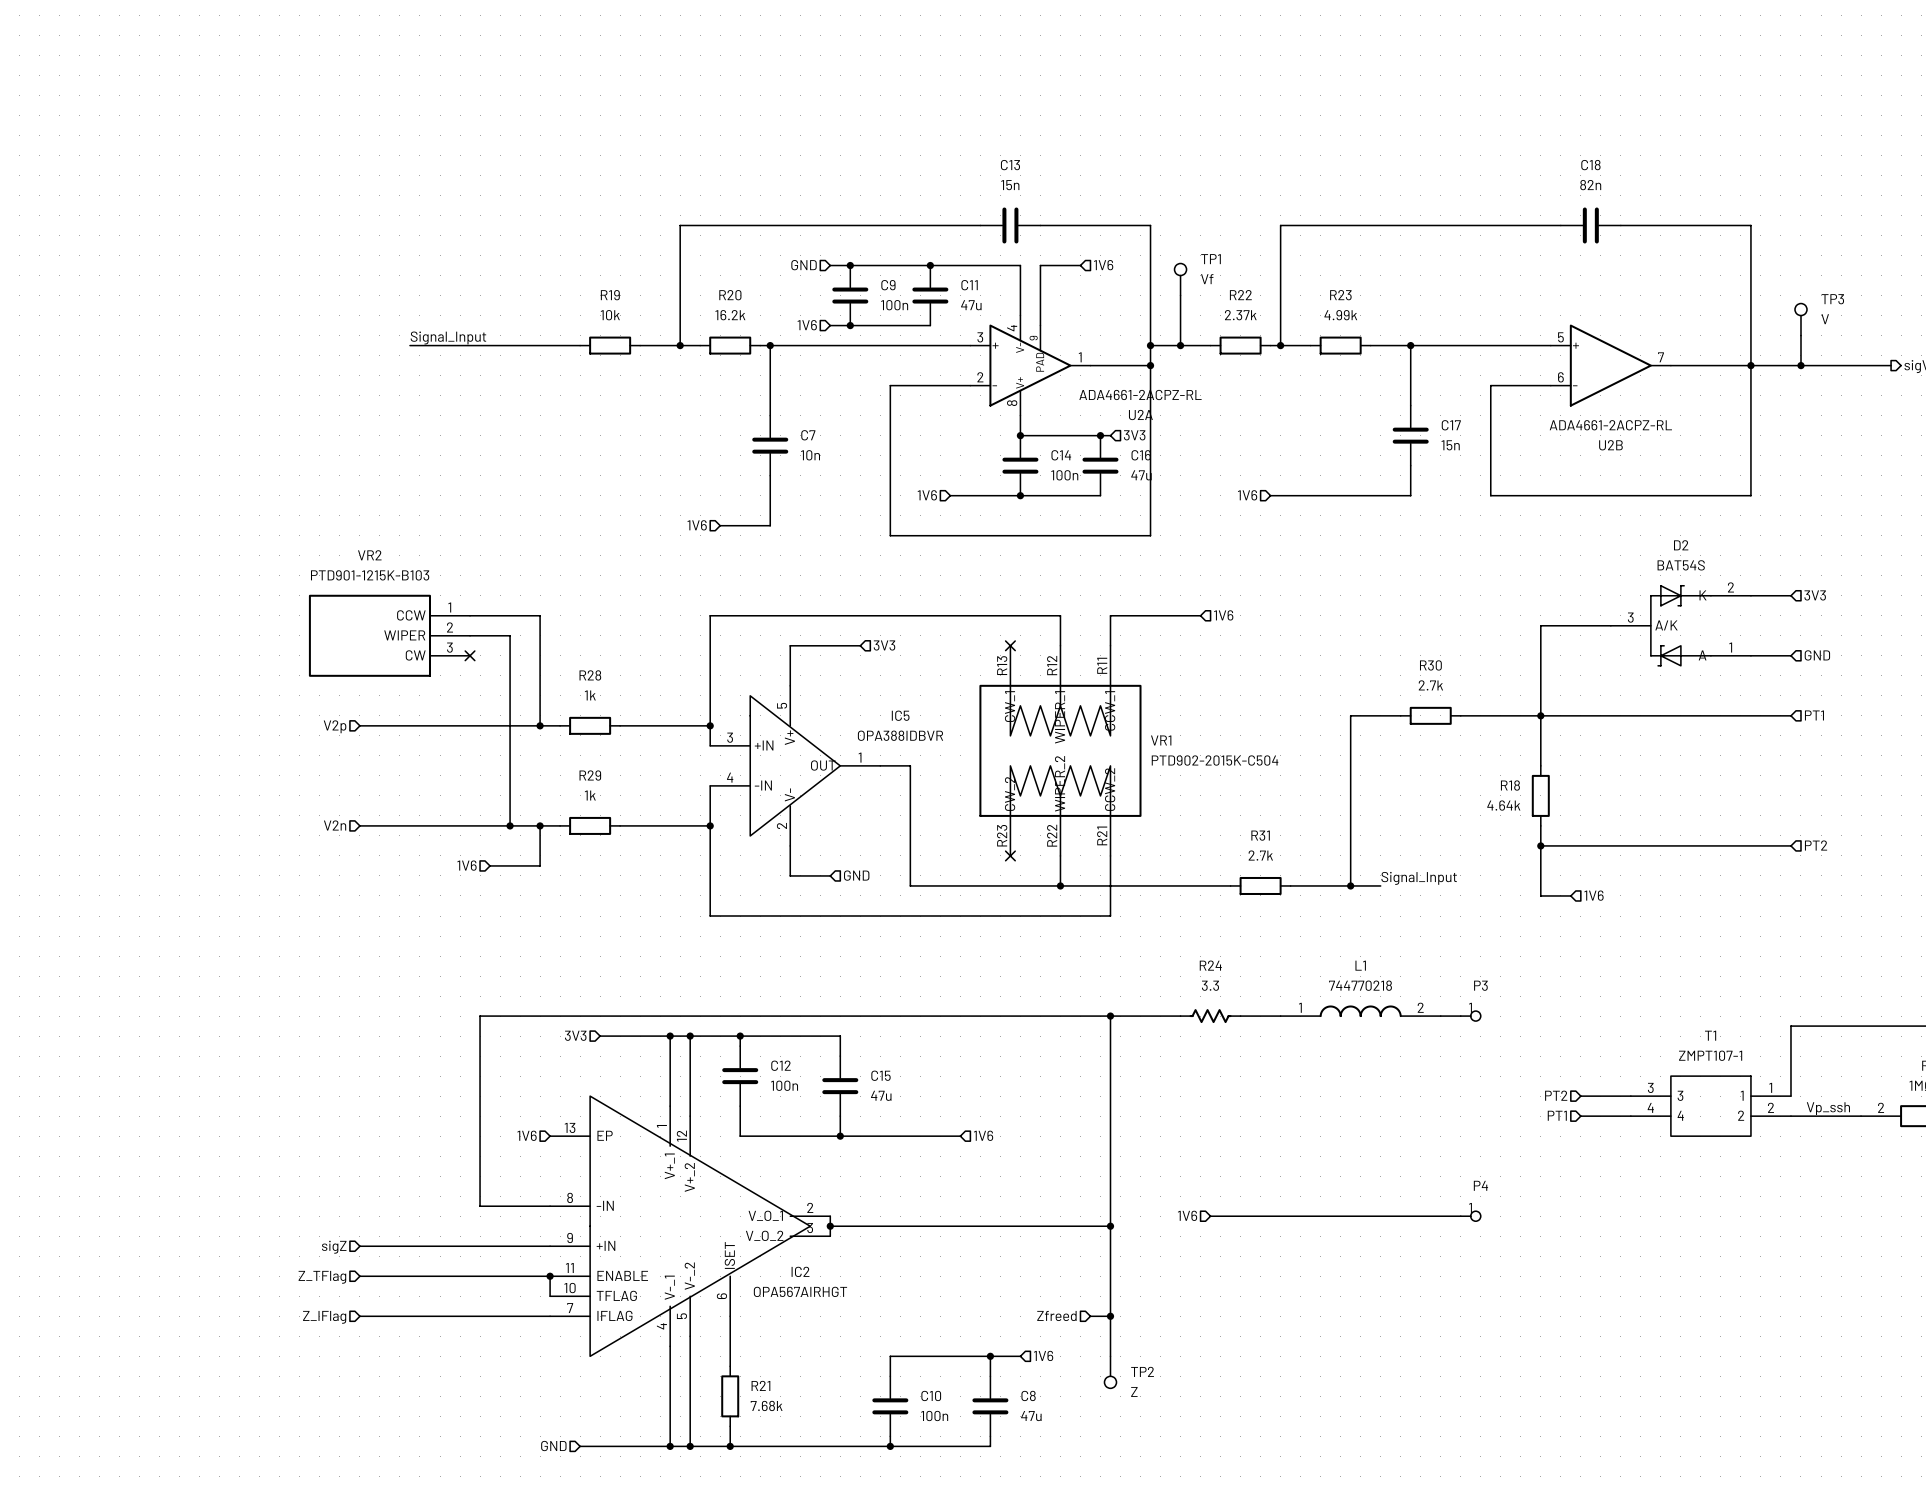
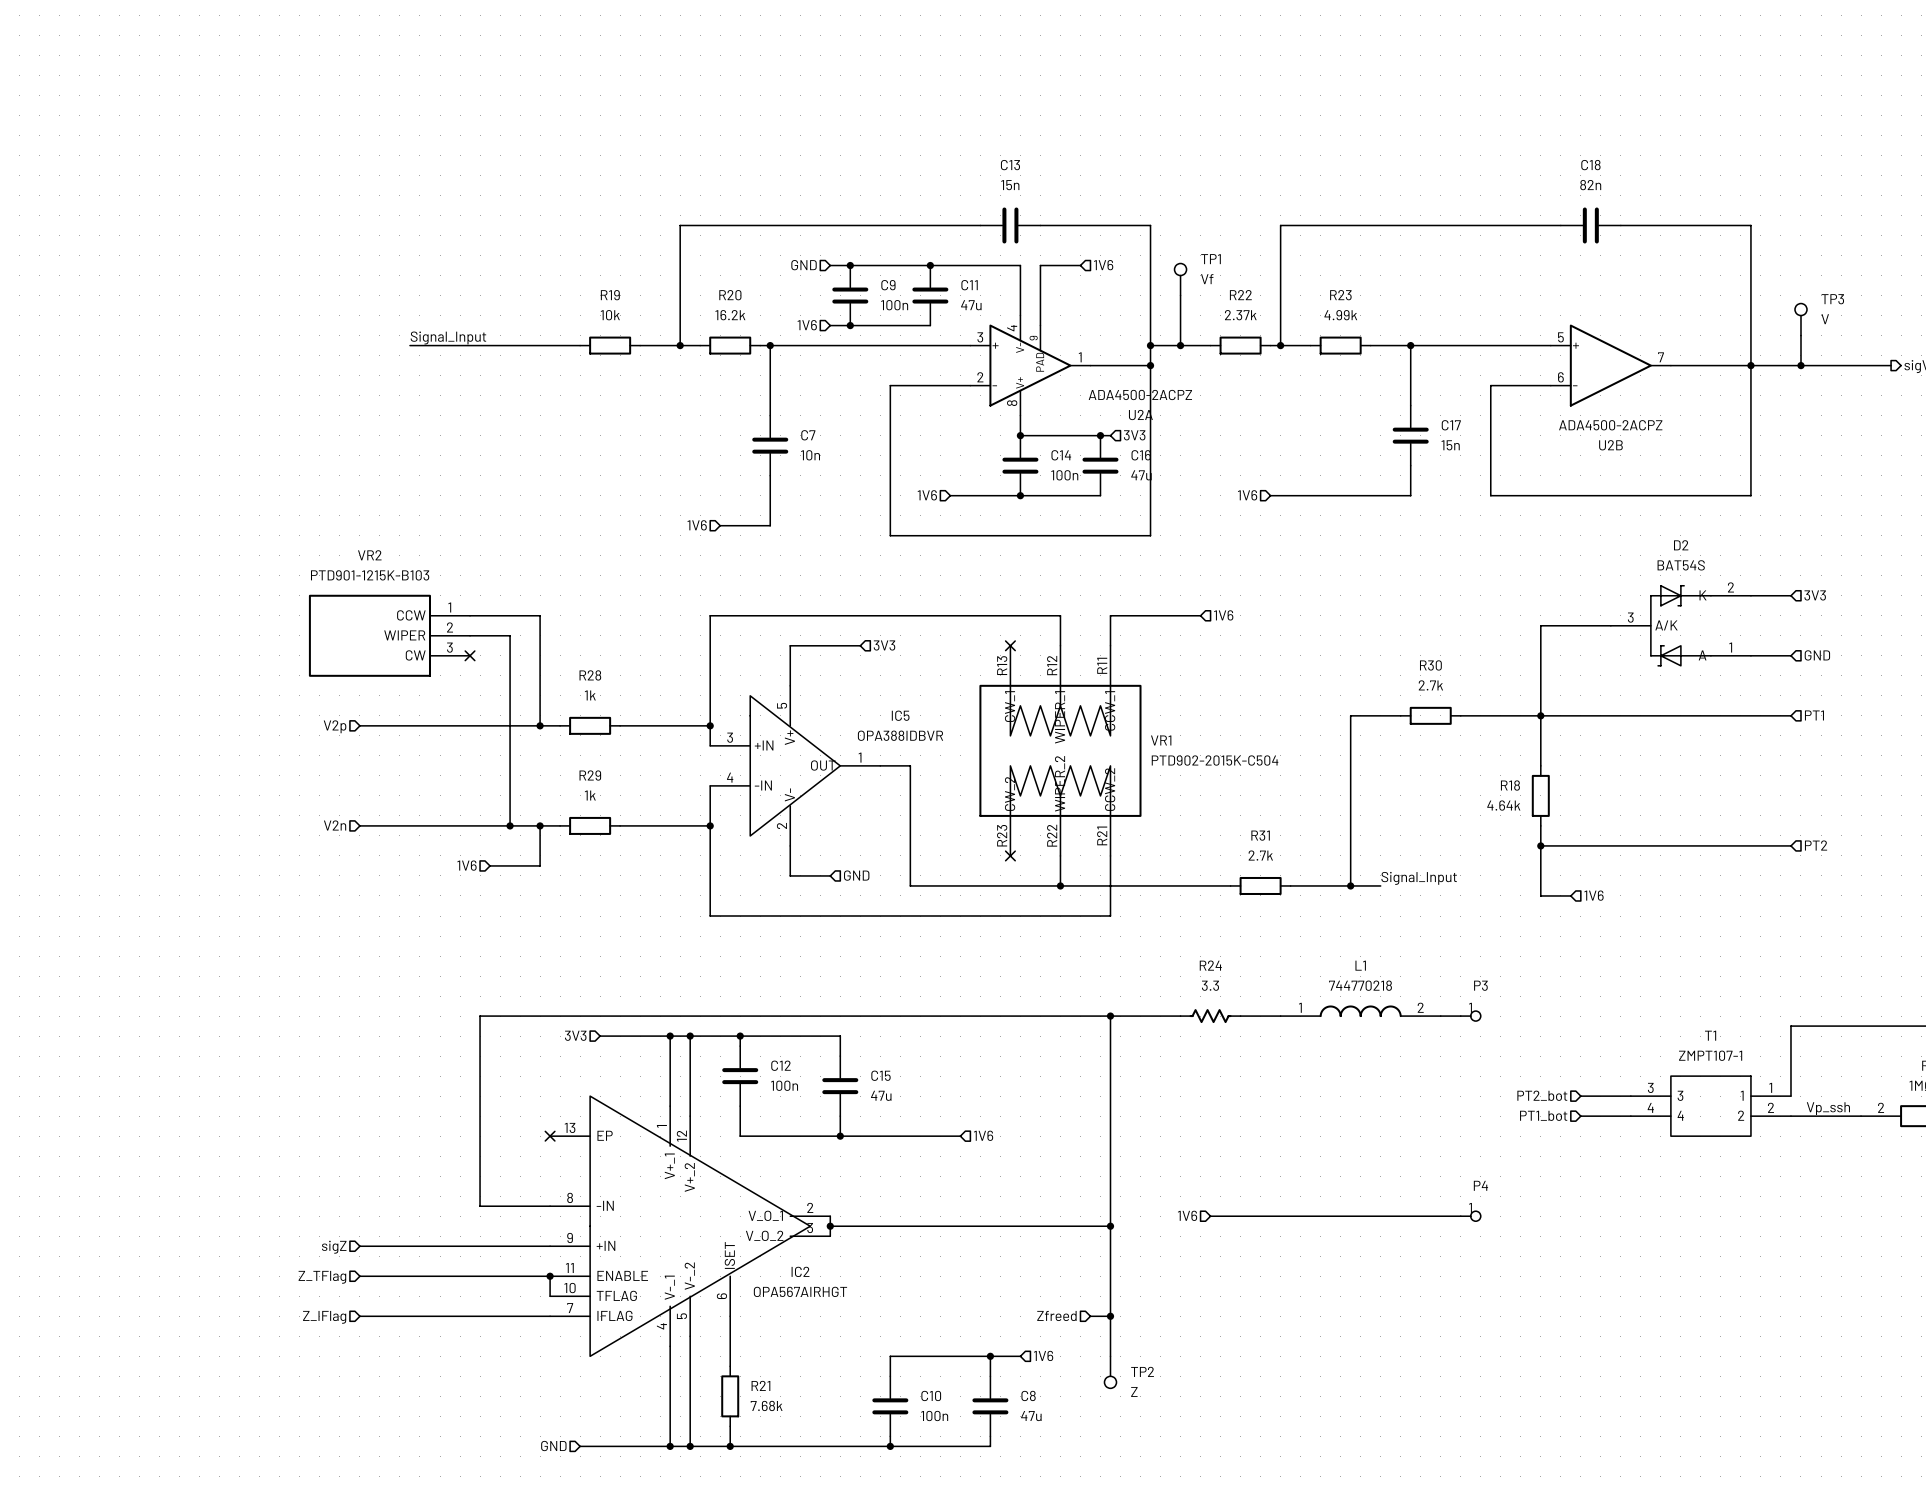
U2A value: ADA4661-2ACPZ-RL (1140, 395) -> ADA4500-2ACPZ (1140, 395)
U2B value: ADA4661-2ACPZ-RL (1610, 425) -> ADA4500-2ACPZ (1610, 425)
hierarchical label: PT2 (1556, 1095) -> PT2_bot (1542, 1095)
hierarchical label: PT1 (1557, 1115) -> PT1_bot (1543, 1115)
hierarchical label: 1V6 (527, 1135) -> none
no-connect mark: none -> (550, 1136)

